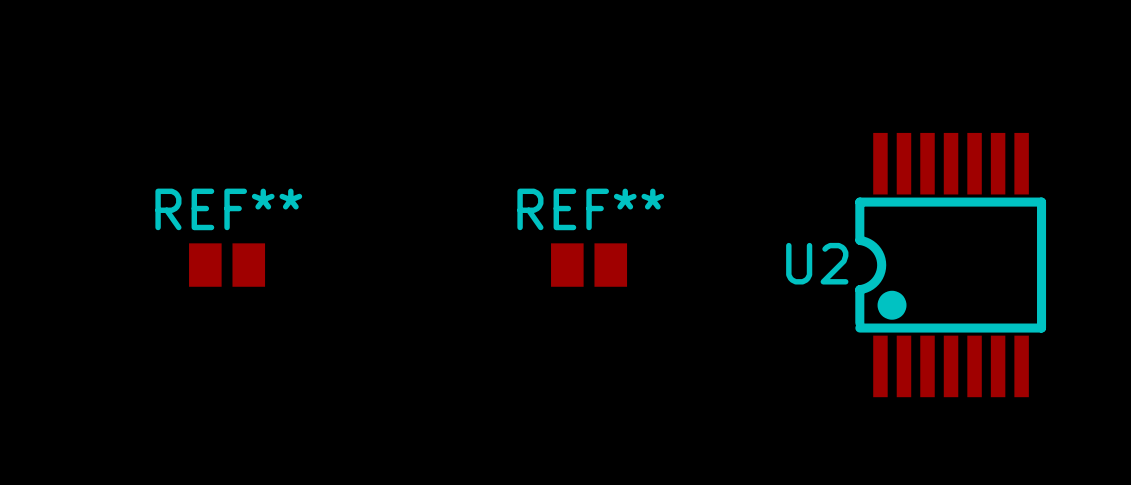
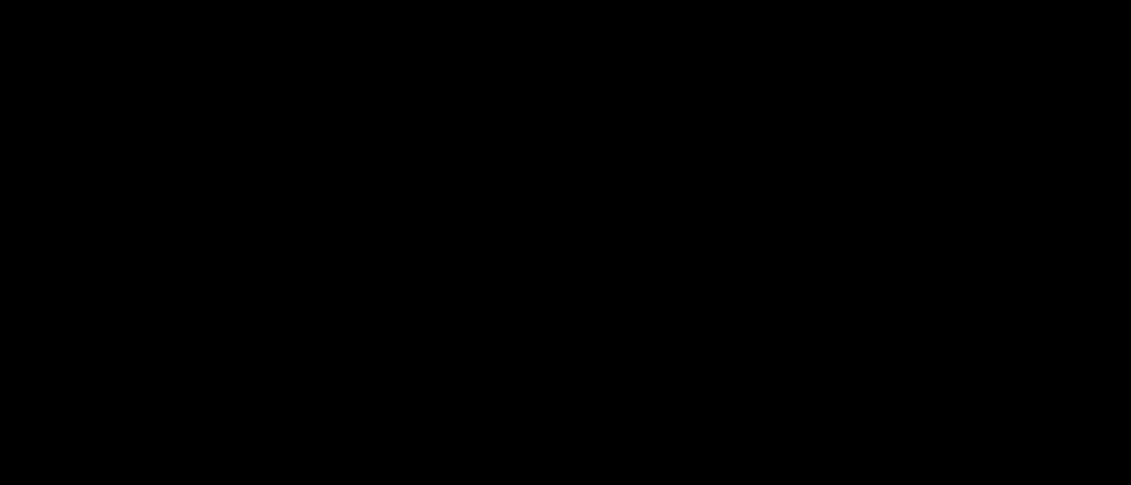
REF**: (227, 265) -> none
REF**: (589, 265) -> none
U2: (950, 265) -> none

